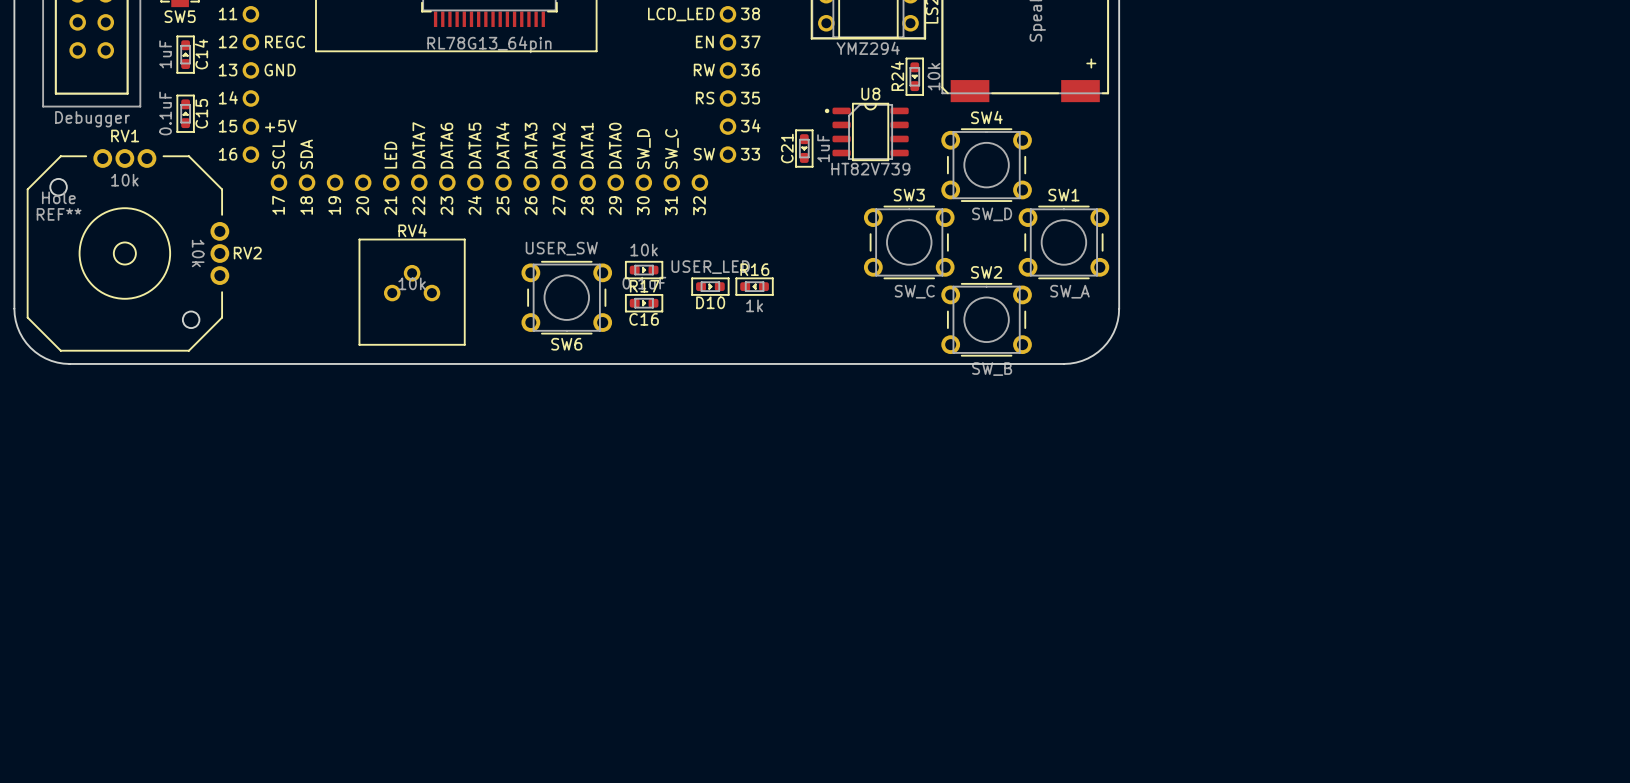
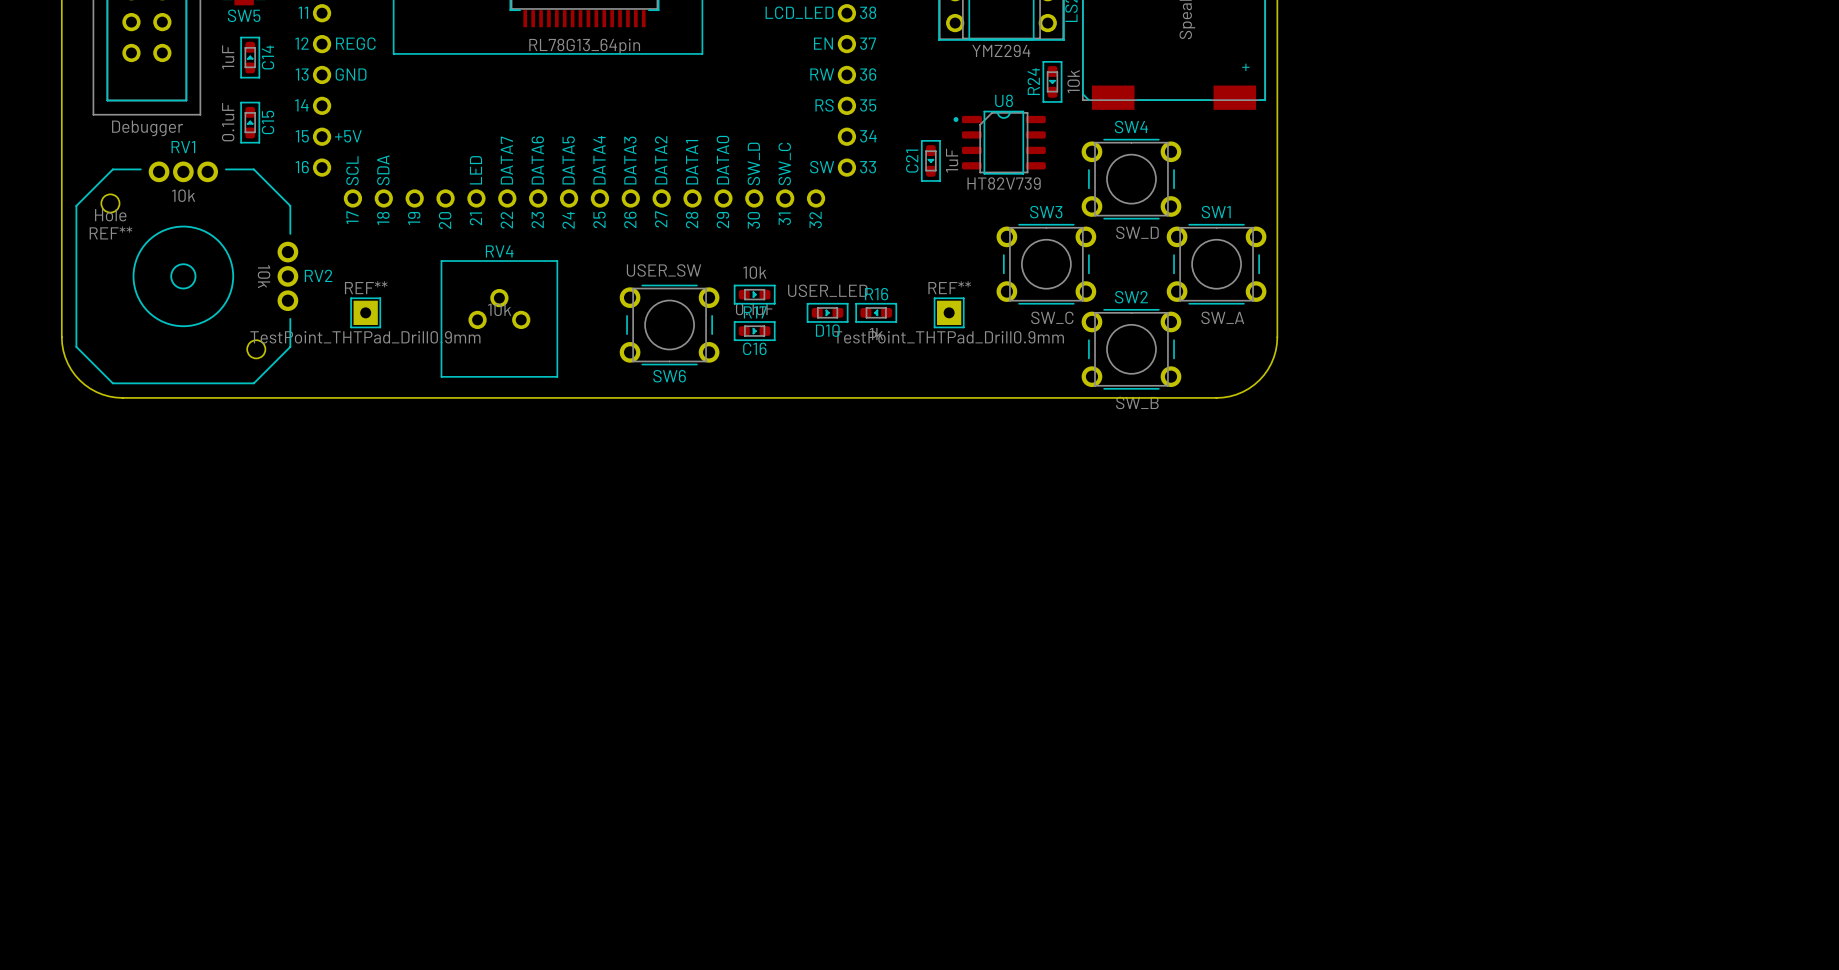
REF**: none -> TestPoint_THTPad_Drill0.9mm (365, 312)
REF**: none -> TestPoint_THTPad_Drill0.9mm (949, 312)

